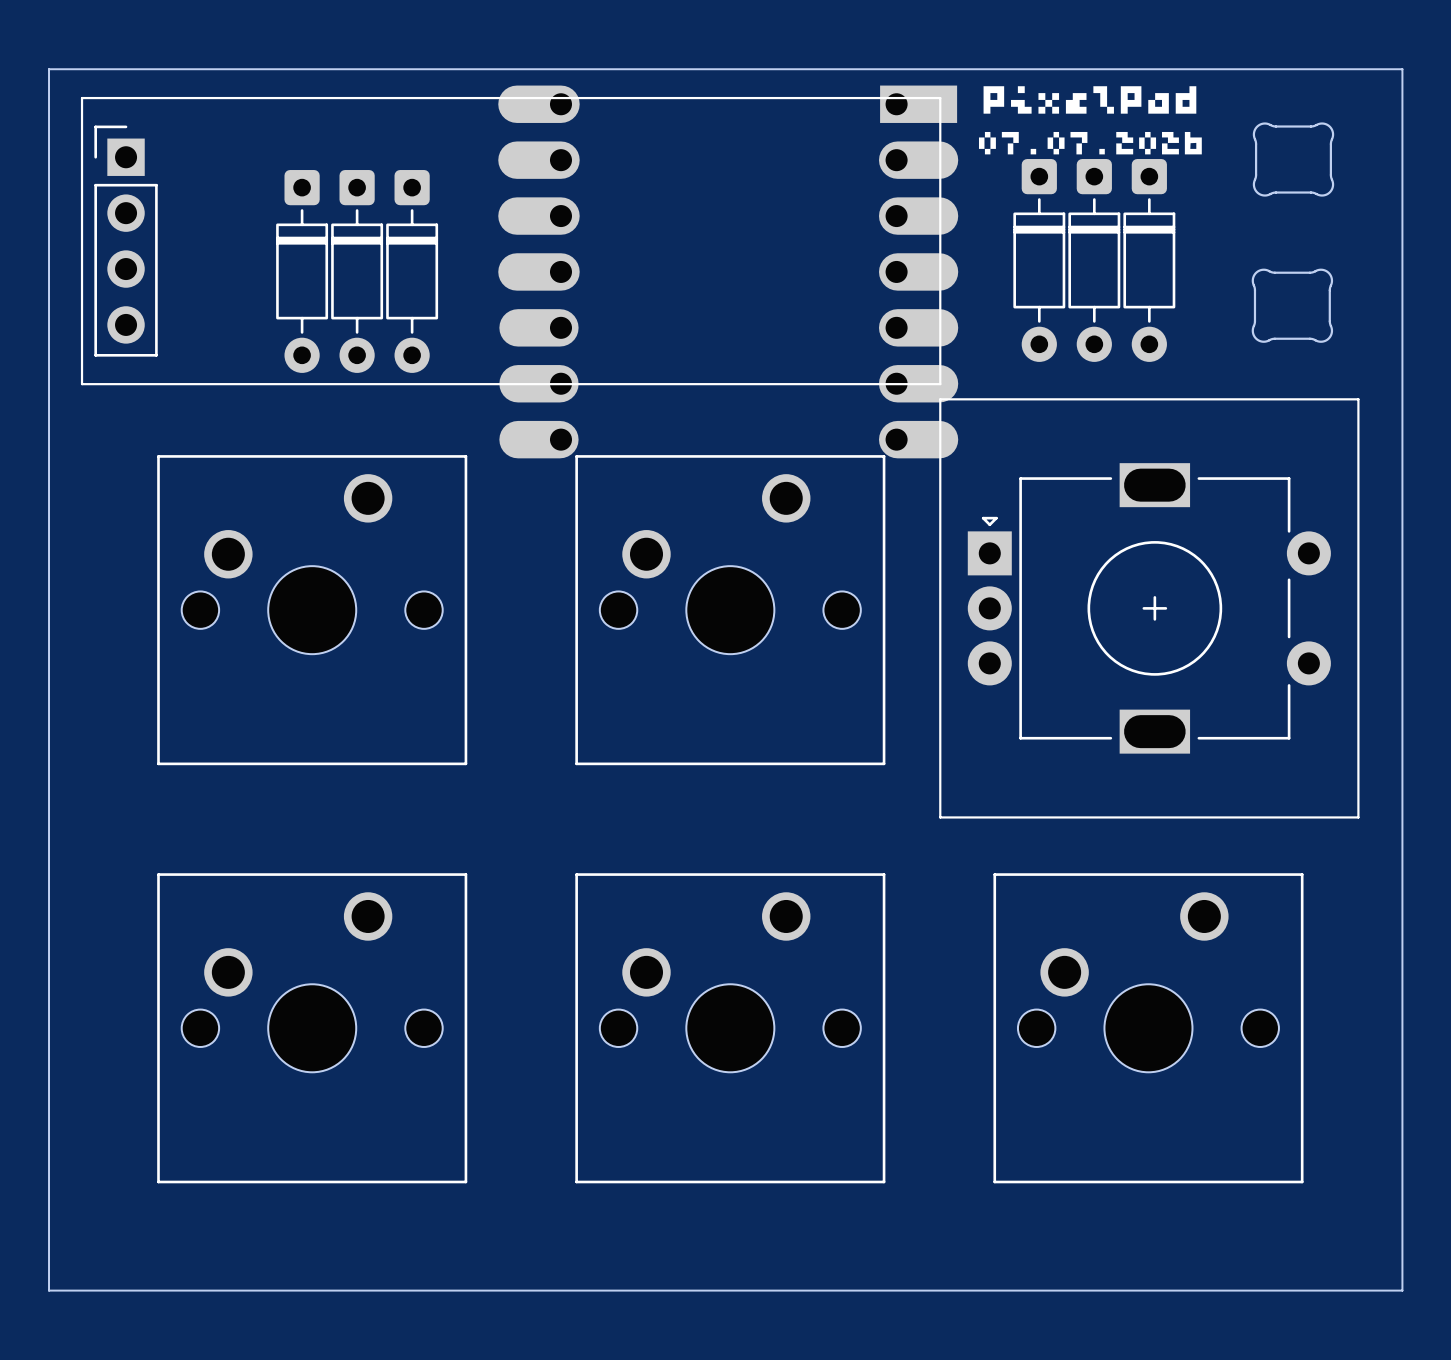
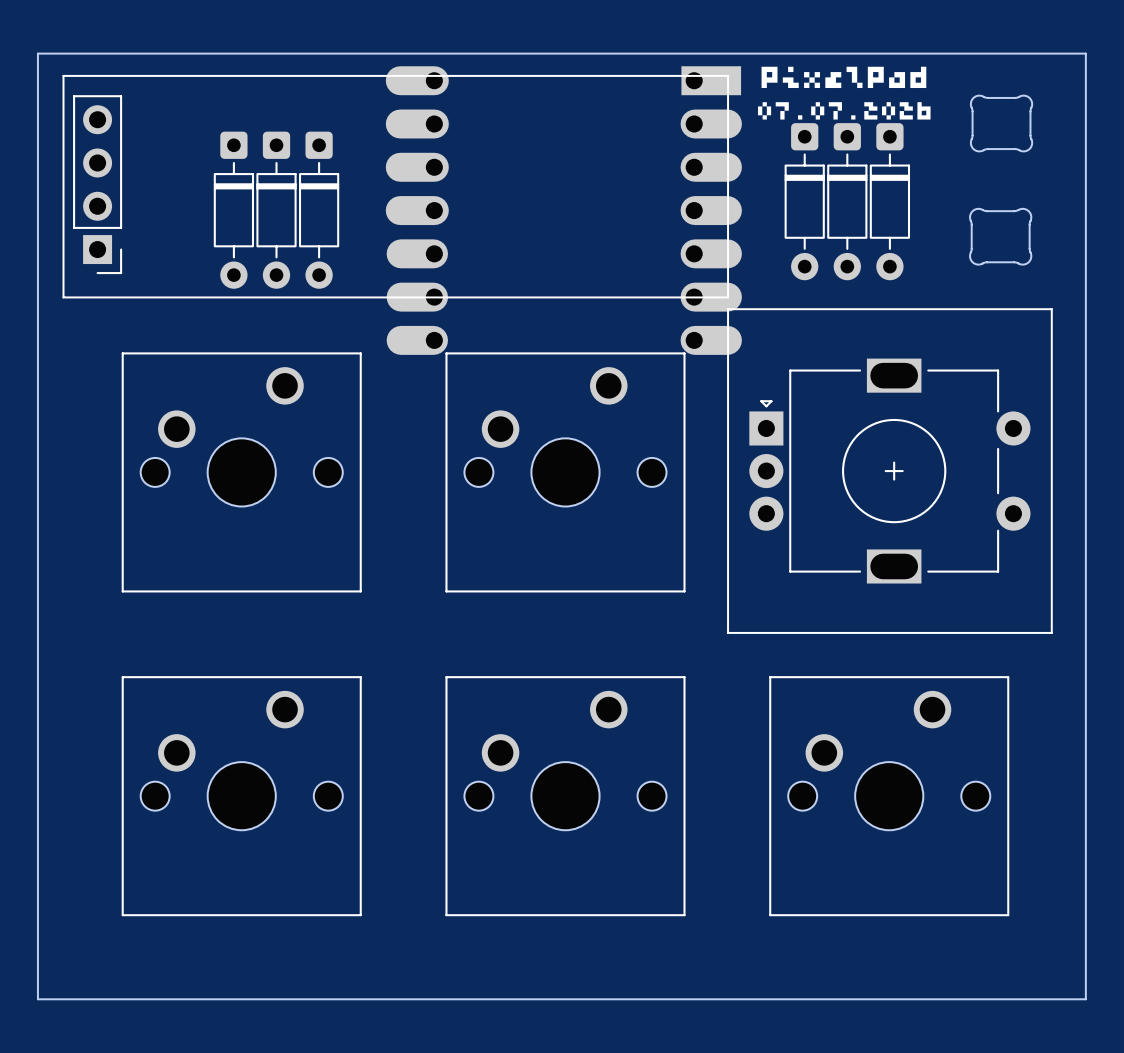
part rotation: 0° (126, 241) -> 180° (97, 184)

